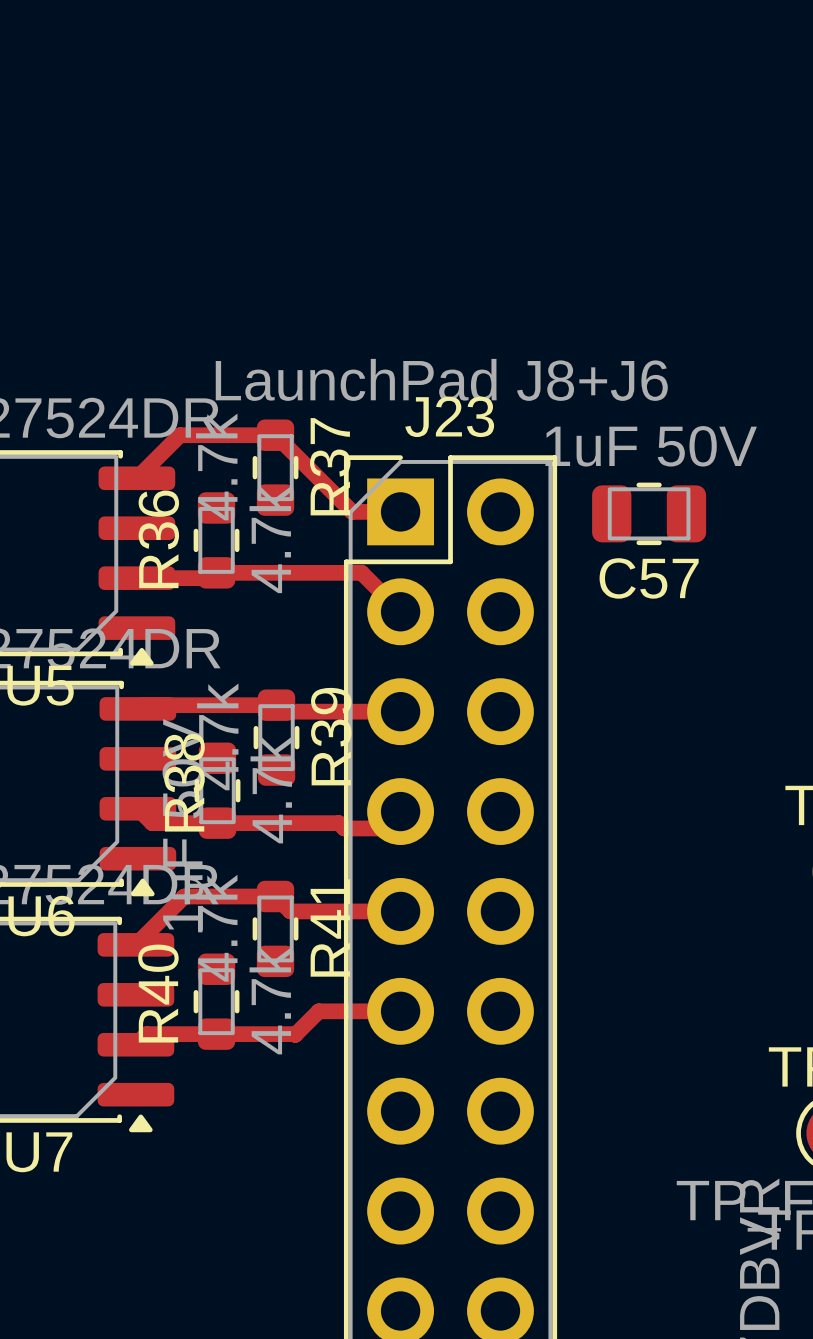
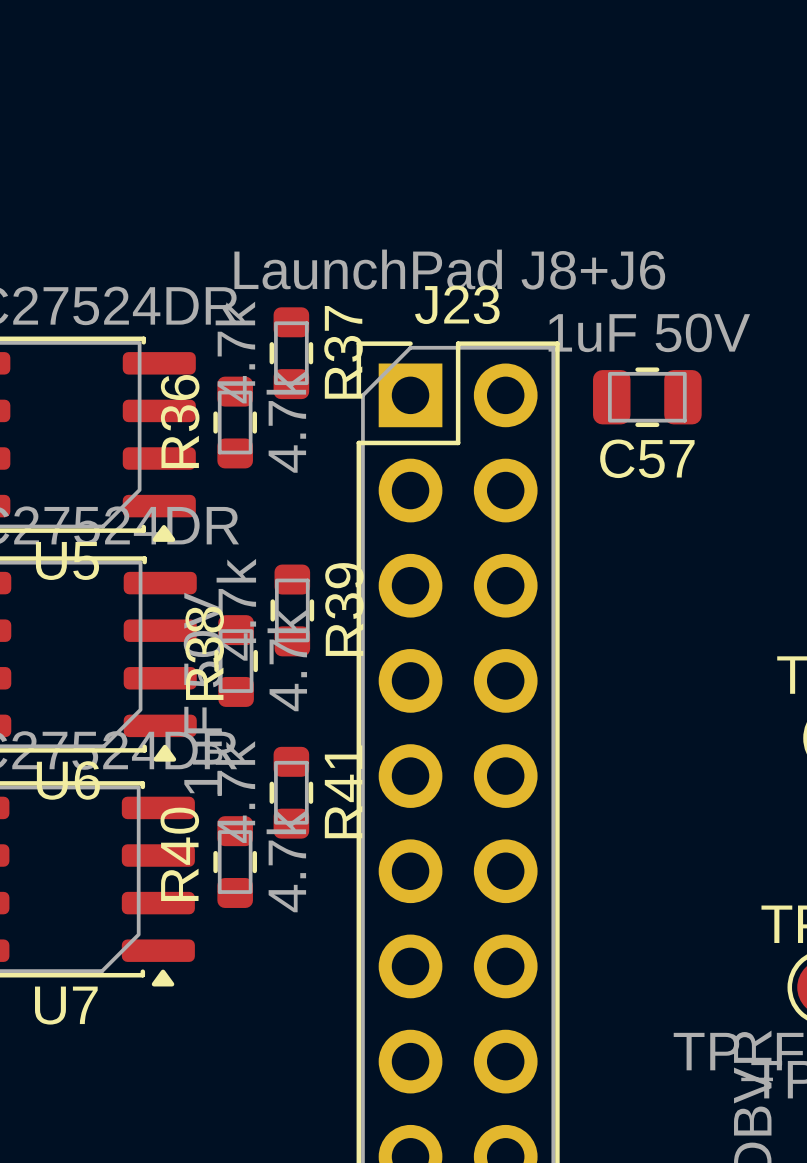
track: (136, 478) (179, 435) (275, 435) (352, 511) (400, 511) -> none
track: (136, 578) (211, 578) (216, 572) (361, 572) (400, 611) -> none
track: (137, 708) (141, 705) (276, 705) (283, 711) (400, 711) -> none
track: (137, 808) (152, 823) (339, 823) (344, 828) (383, 828) (400, 811) -> none
track: (400, 911) (290, 911) (275, 896) (184, 896) (135, 944) -> none
track: (400, 1011) (318, 1011) (295, 1034) (146, 1034) (135, 1044) -> none

